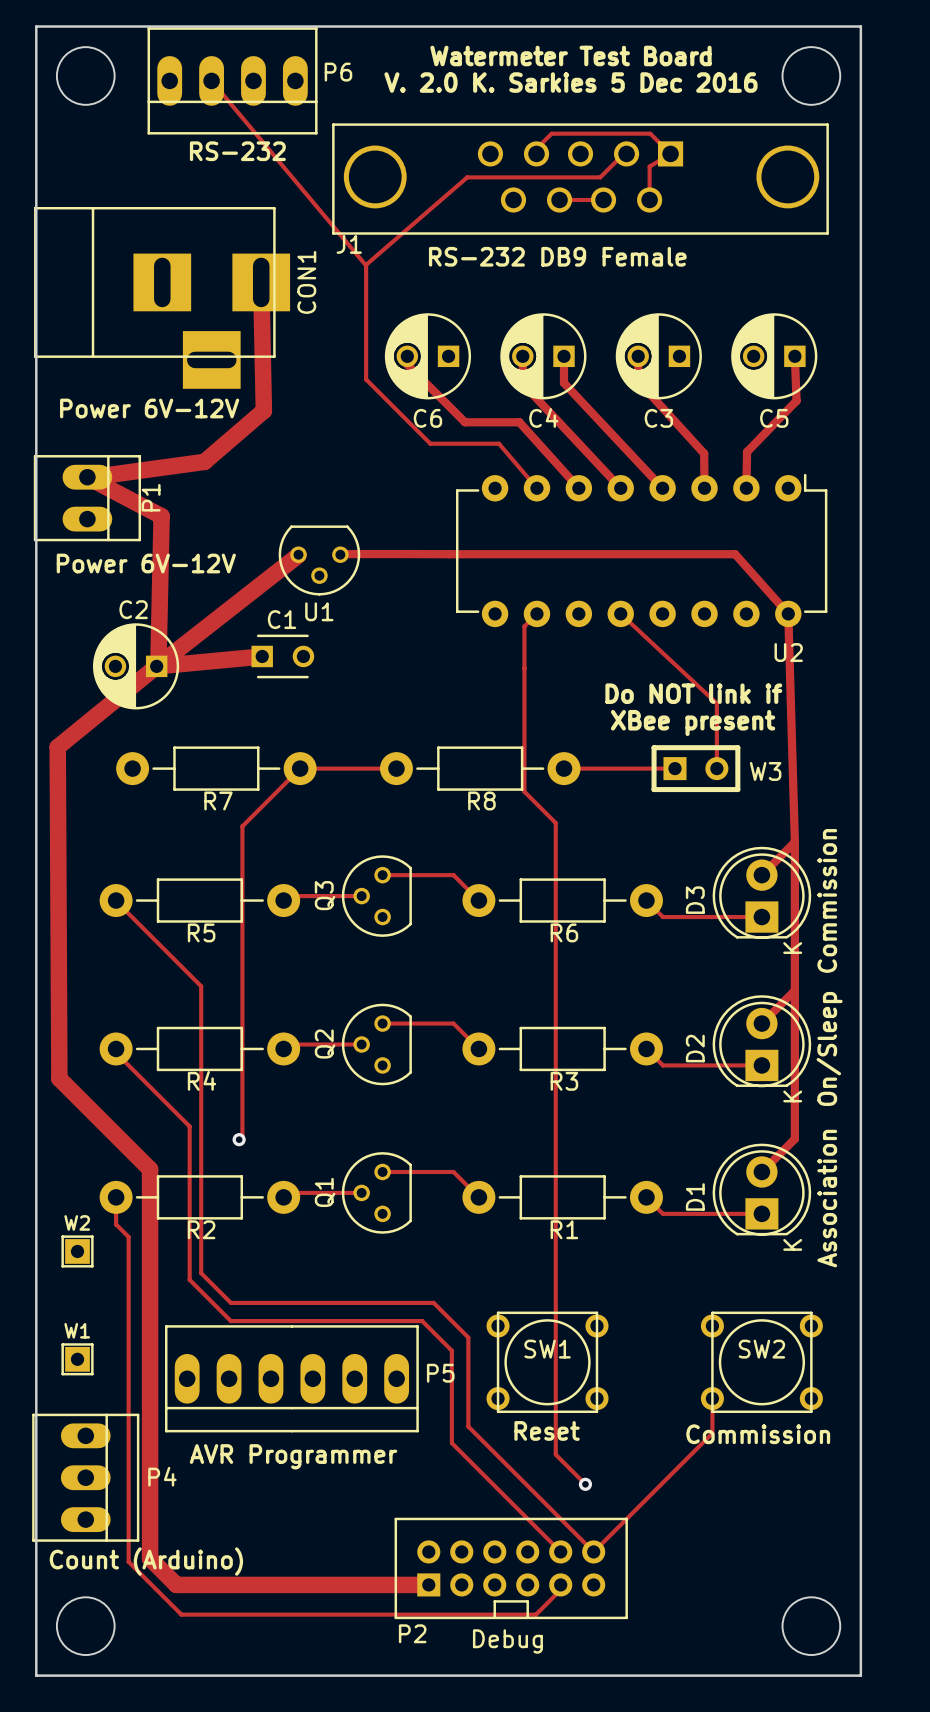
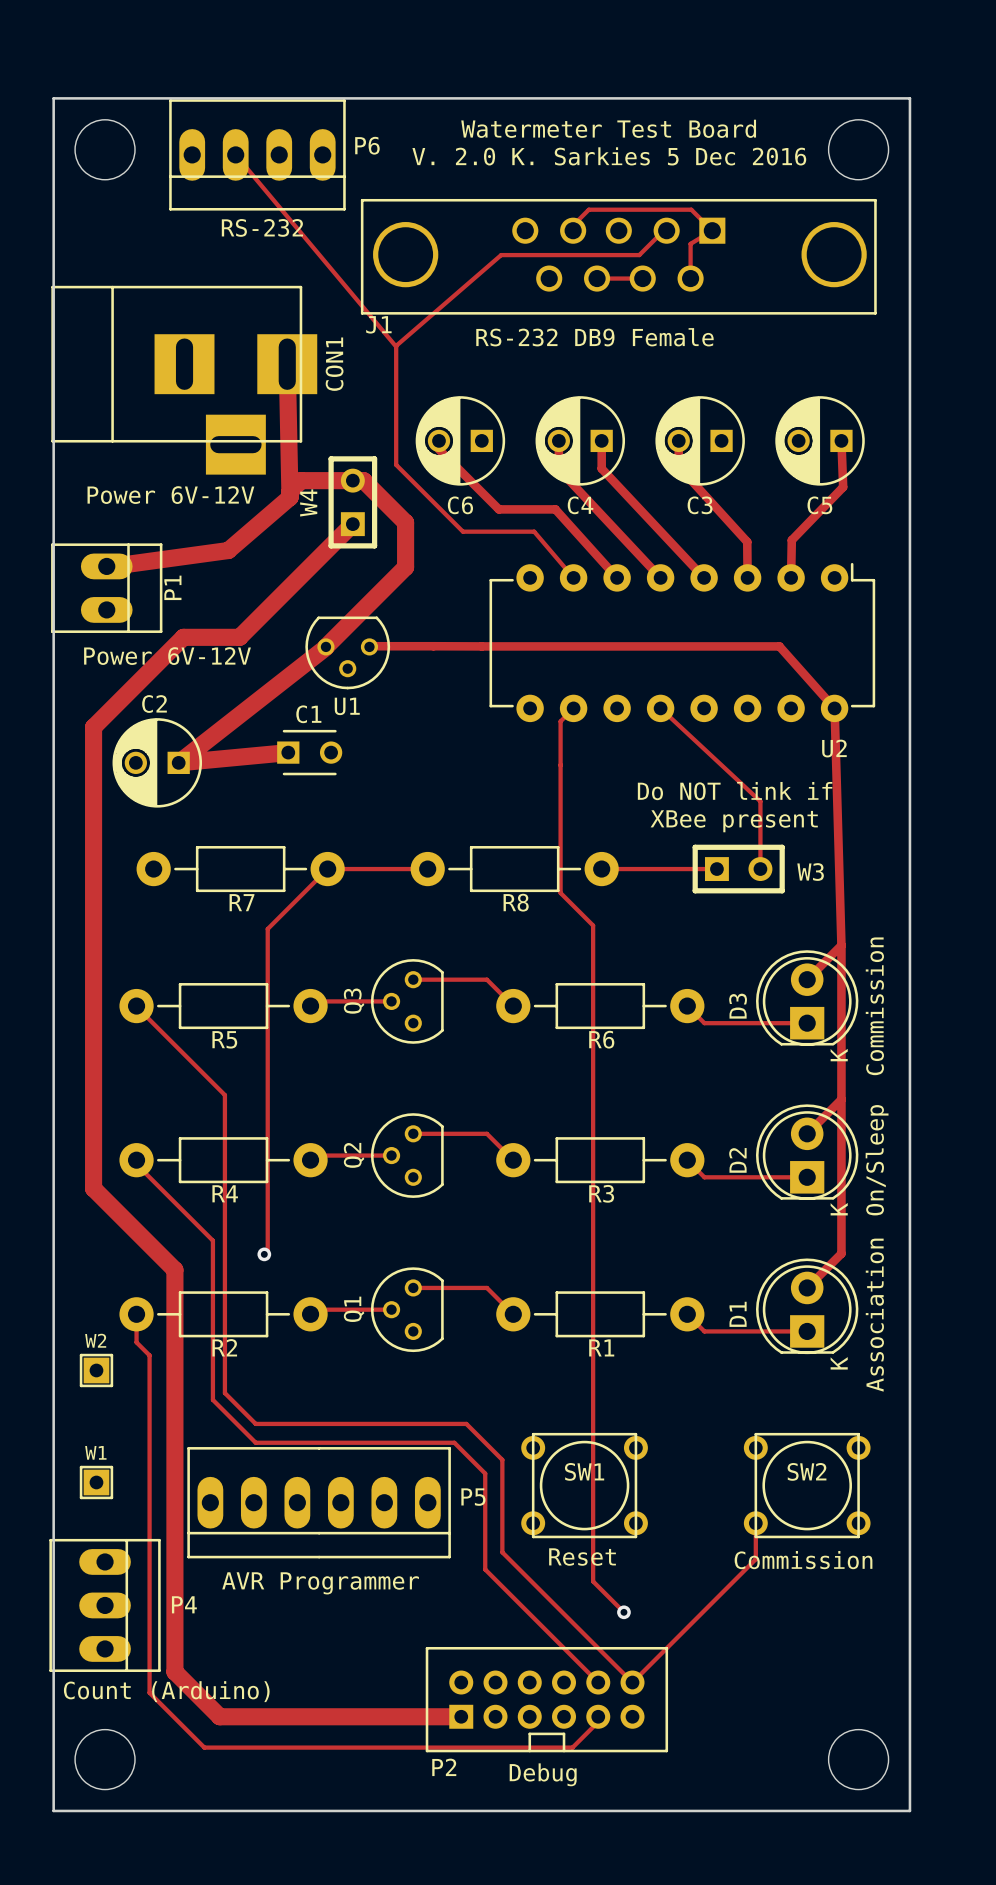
track: none -> (290, 497) (290, 491) (301, 480) (363, 480) (405, 522) (405, 567) (325, 646)
W4: none -> (352, 502)
track: (87, 477) (161, 516) (158, 668) -> none
track: (156, 666) (57, 747) (59, 1078) (150, 1169) (150, 1558) (176, 1584) (196, 1584) -> (352, 524) (239, 637) (183, 637) (93, 727) (93, 1188) (174, 1269) (174, 1671) (219, 1716)

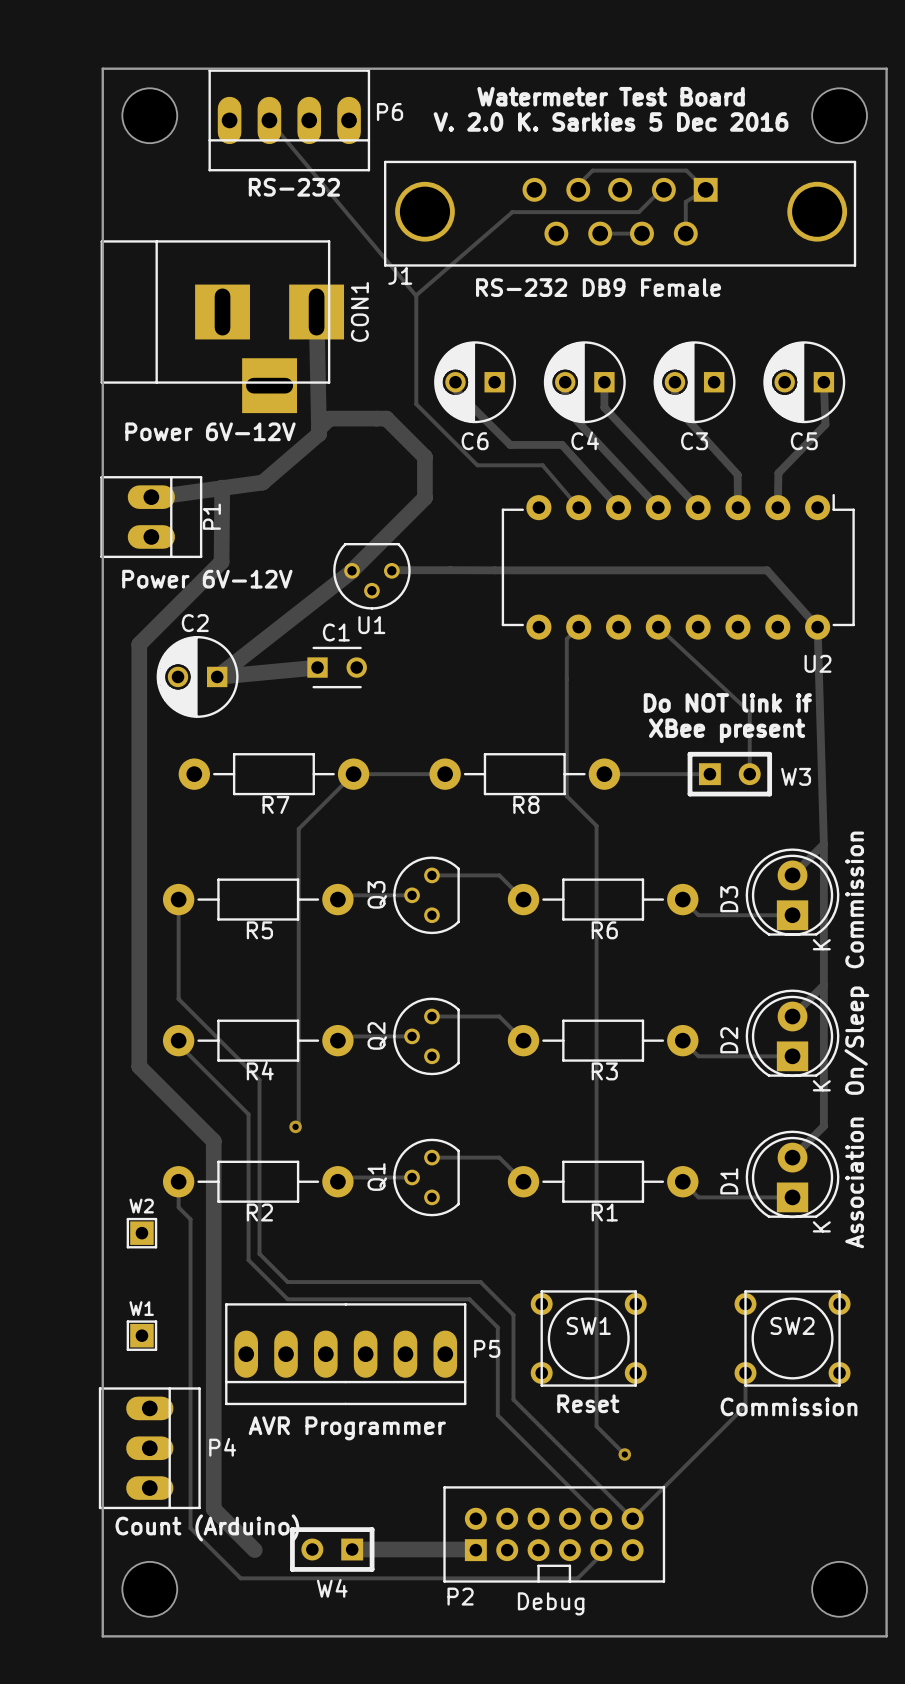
W4 rotation: 0° (352, 502) -> 90° counterclockwise (332, 1549)
W4 position: (352, 502) -> (332, 1549)
track: (352, 524) (239, 637) (183, 637) -> (222, 487) (221, 562)
track: (136, 1006) (224, 1095) (224, 1203) -> (178, 900) (178, 999) (259, 1079)
track: (219, 1716) (461, 1716) -> (352, 1549) (475, 1550)

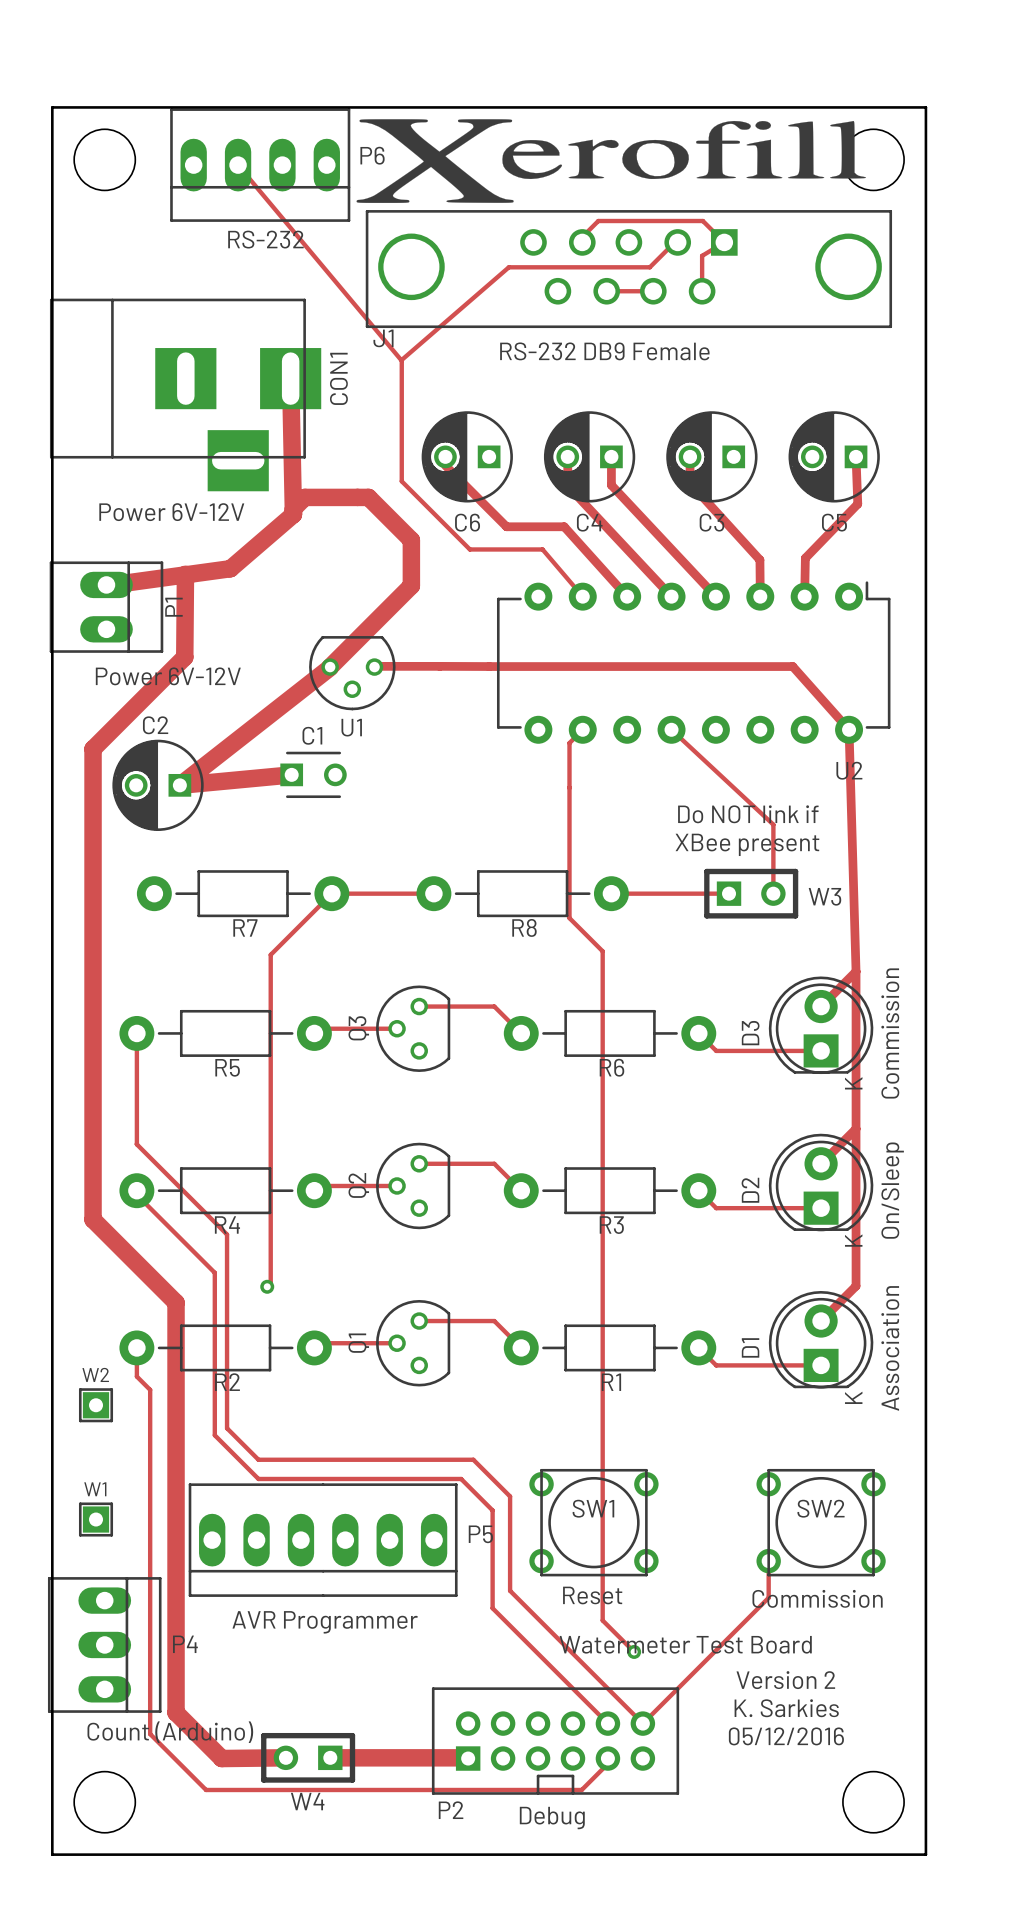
drawing: none -> [356, 119, 867, 203]
text: Watermeter Test Board (611, 96) -> none
text: V. 2.0 K. Sarkies 5 Dec 2016 (611, 121) -> none
text: none -> Watermeter Test Board (685, 1644)
text: none -> Version 2 (785, 1680)
text: none -> K. Sarkies (786, 1708)
text: none -> 05/12/2016 (786, 1736)
track: none -> (283, 1757) (221, 1758)

